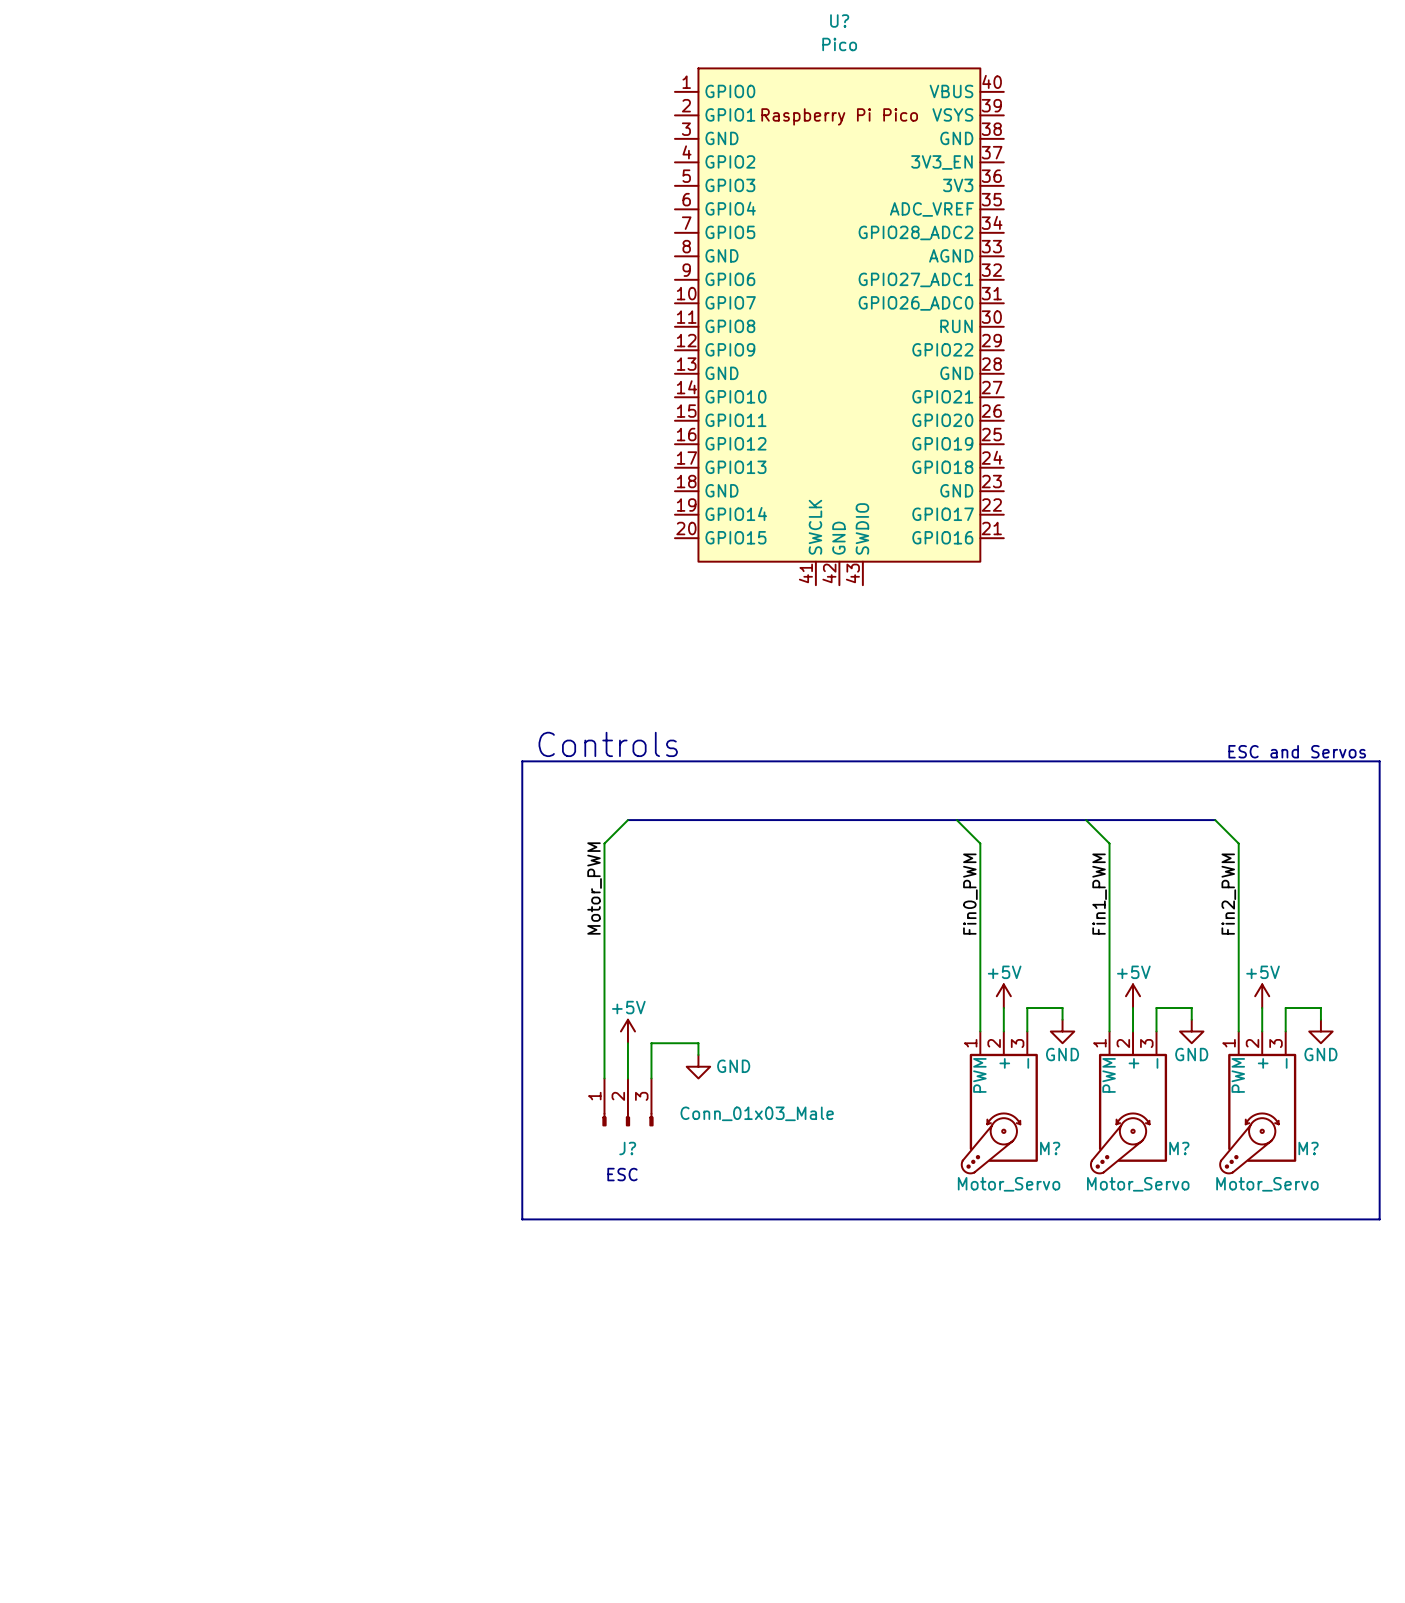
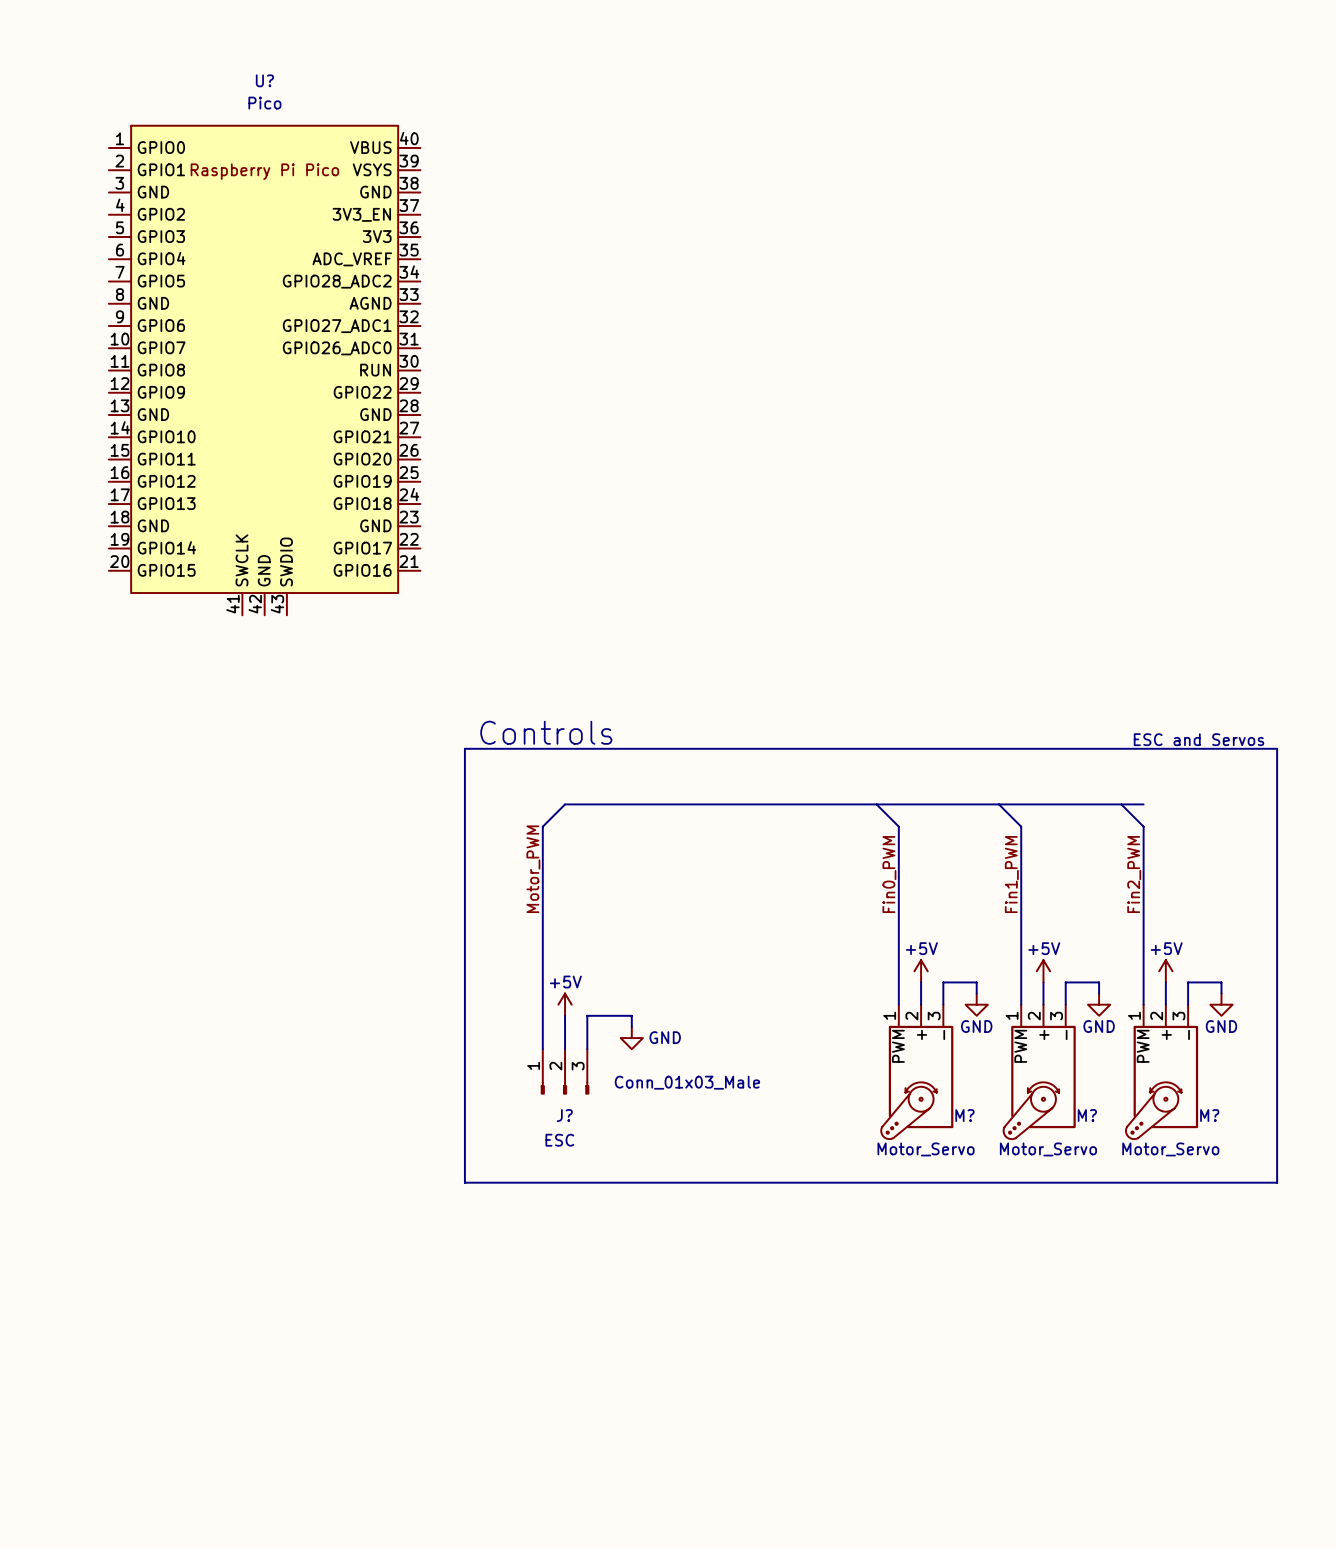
U?: Pico (839, 326) -> none
U?: none -> Pico (264, 370)
bus: none -> (1121, 804) (1143, 804)

